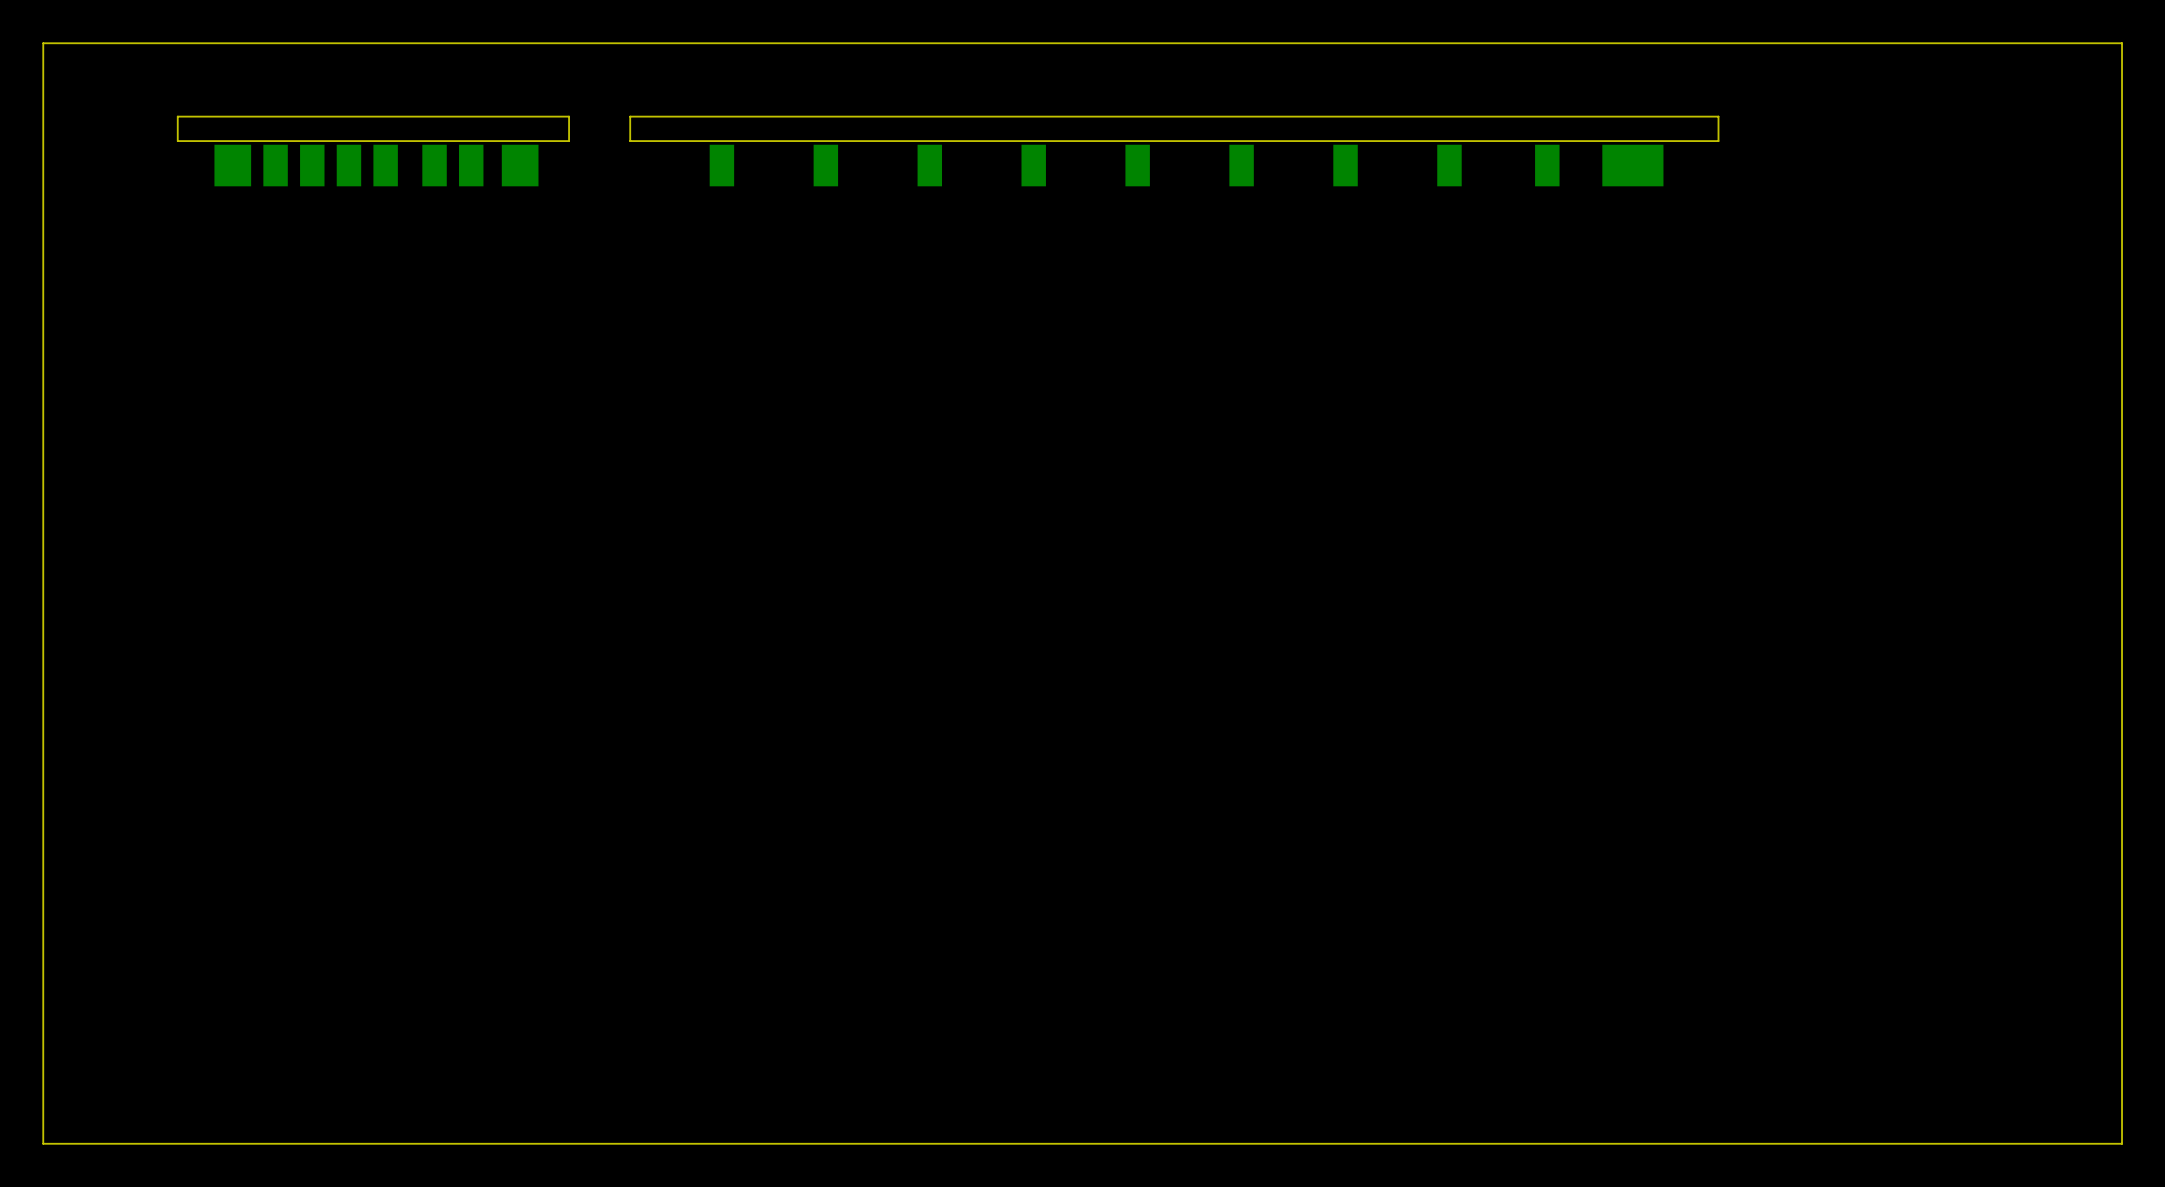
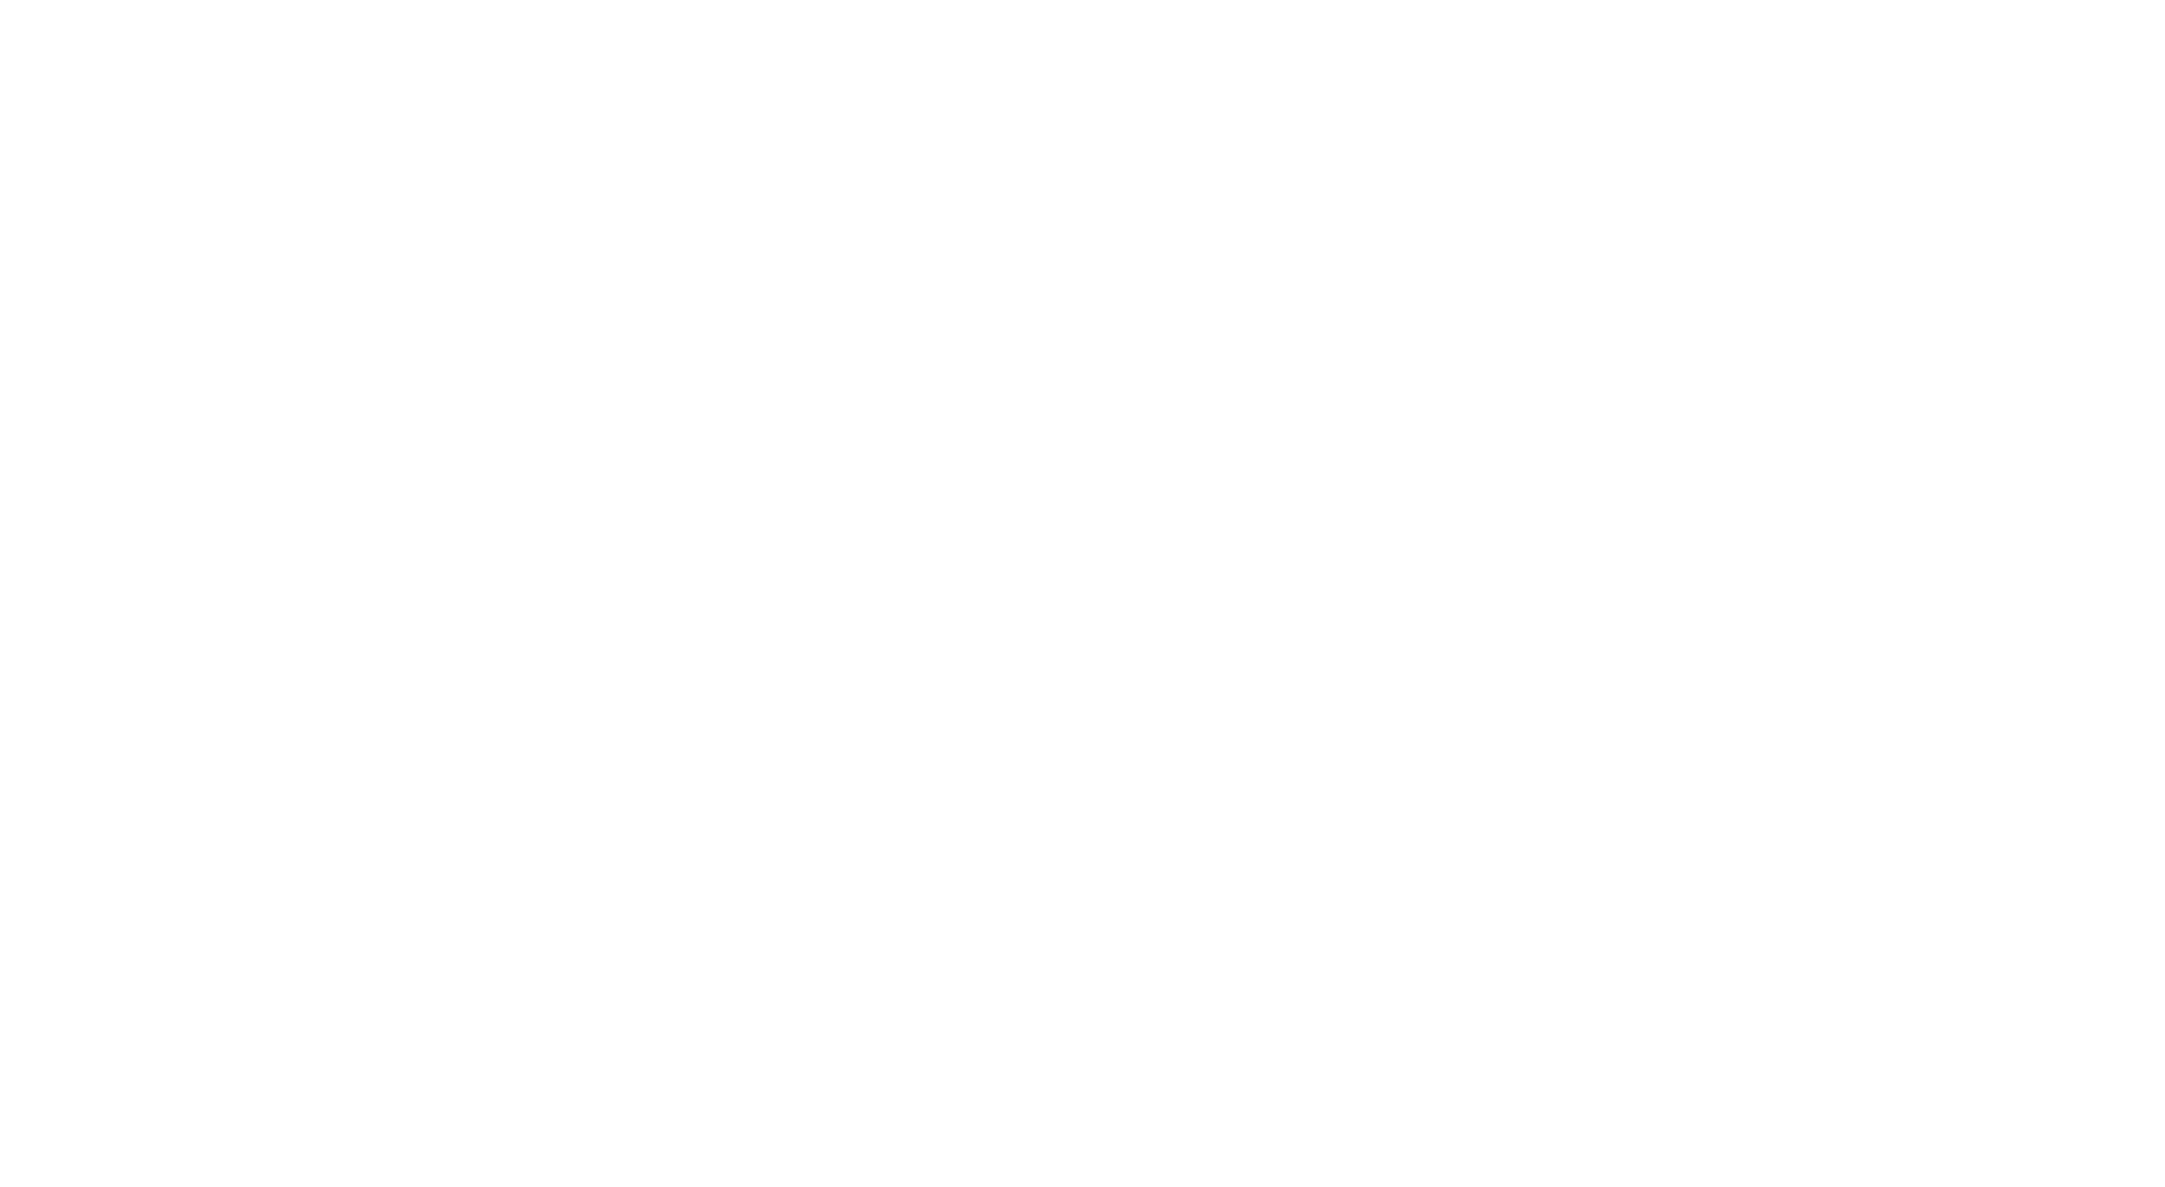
board edge: (43, 43) (43, 1143) (2122, 1143) (2122, 43) (43, 43) -> none
board edge: (177, 116) (569, 116) (569, 141) (177, 141) (177, 116) -> none
board edge: (630, 116) (630, 141) (1718, 141) (1718, 116) (630, 116) -> none
part: (232, 165) -> none
part: (275, 165) -> none
part: (312, 165) -> none
part: (348, 165) -> none
part: (385, 165) -> none
part: (434, 165) -> none
part: (471, 165) -> none
part: (520, 165) -> none
part: (721, 165) -> none
part: (825, 165) -> none
part: (929, 165) -> none
part: (1033, 165) -> none
part: (1137, 165) -> none
part: (1241, 165) -> none
part: (1345, 165) -> none
part: (1449, 165) -> none
part: (1547, 165) -> none
part: (1632, 165) -> none

